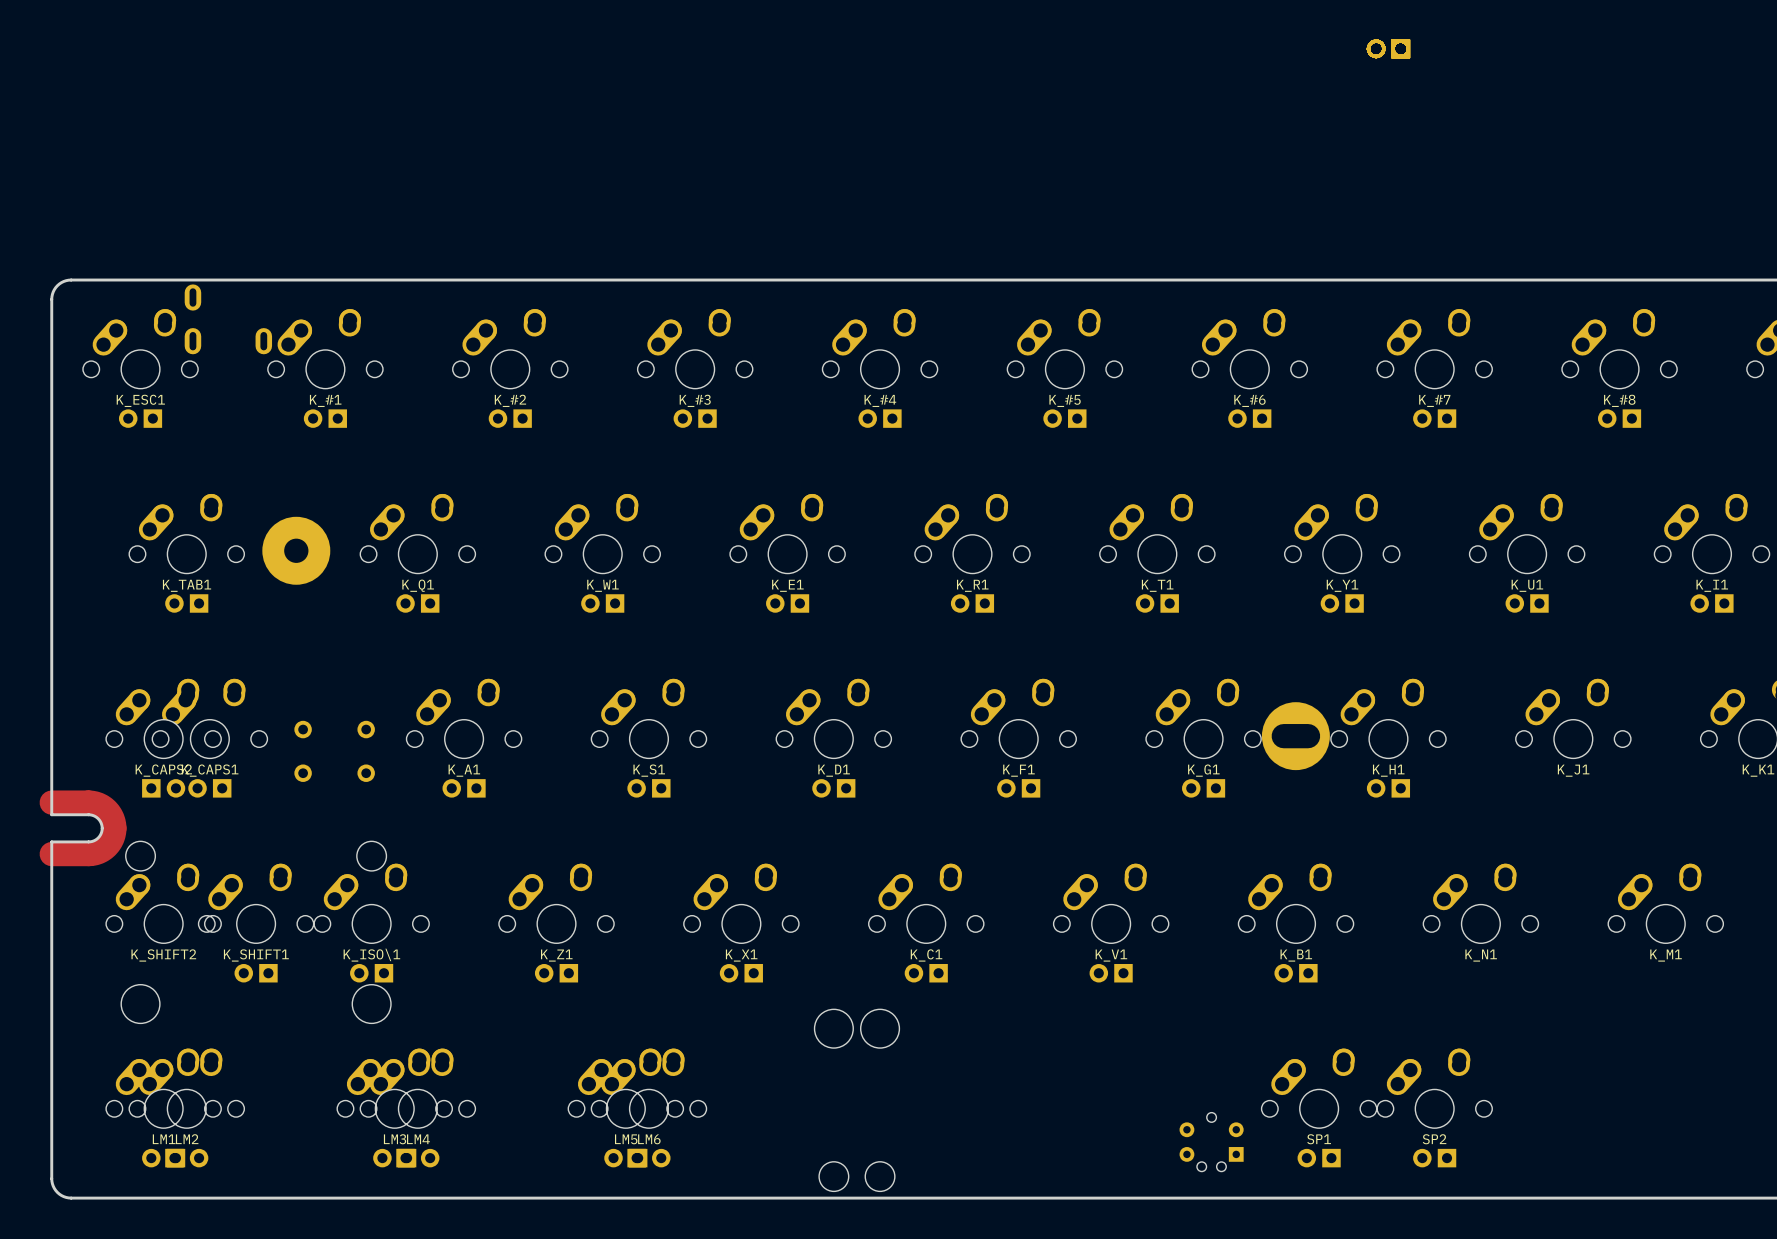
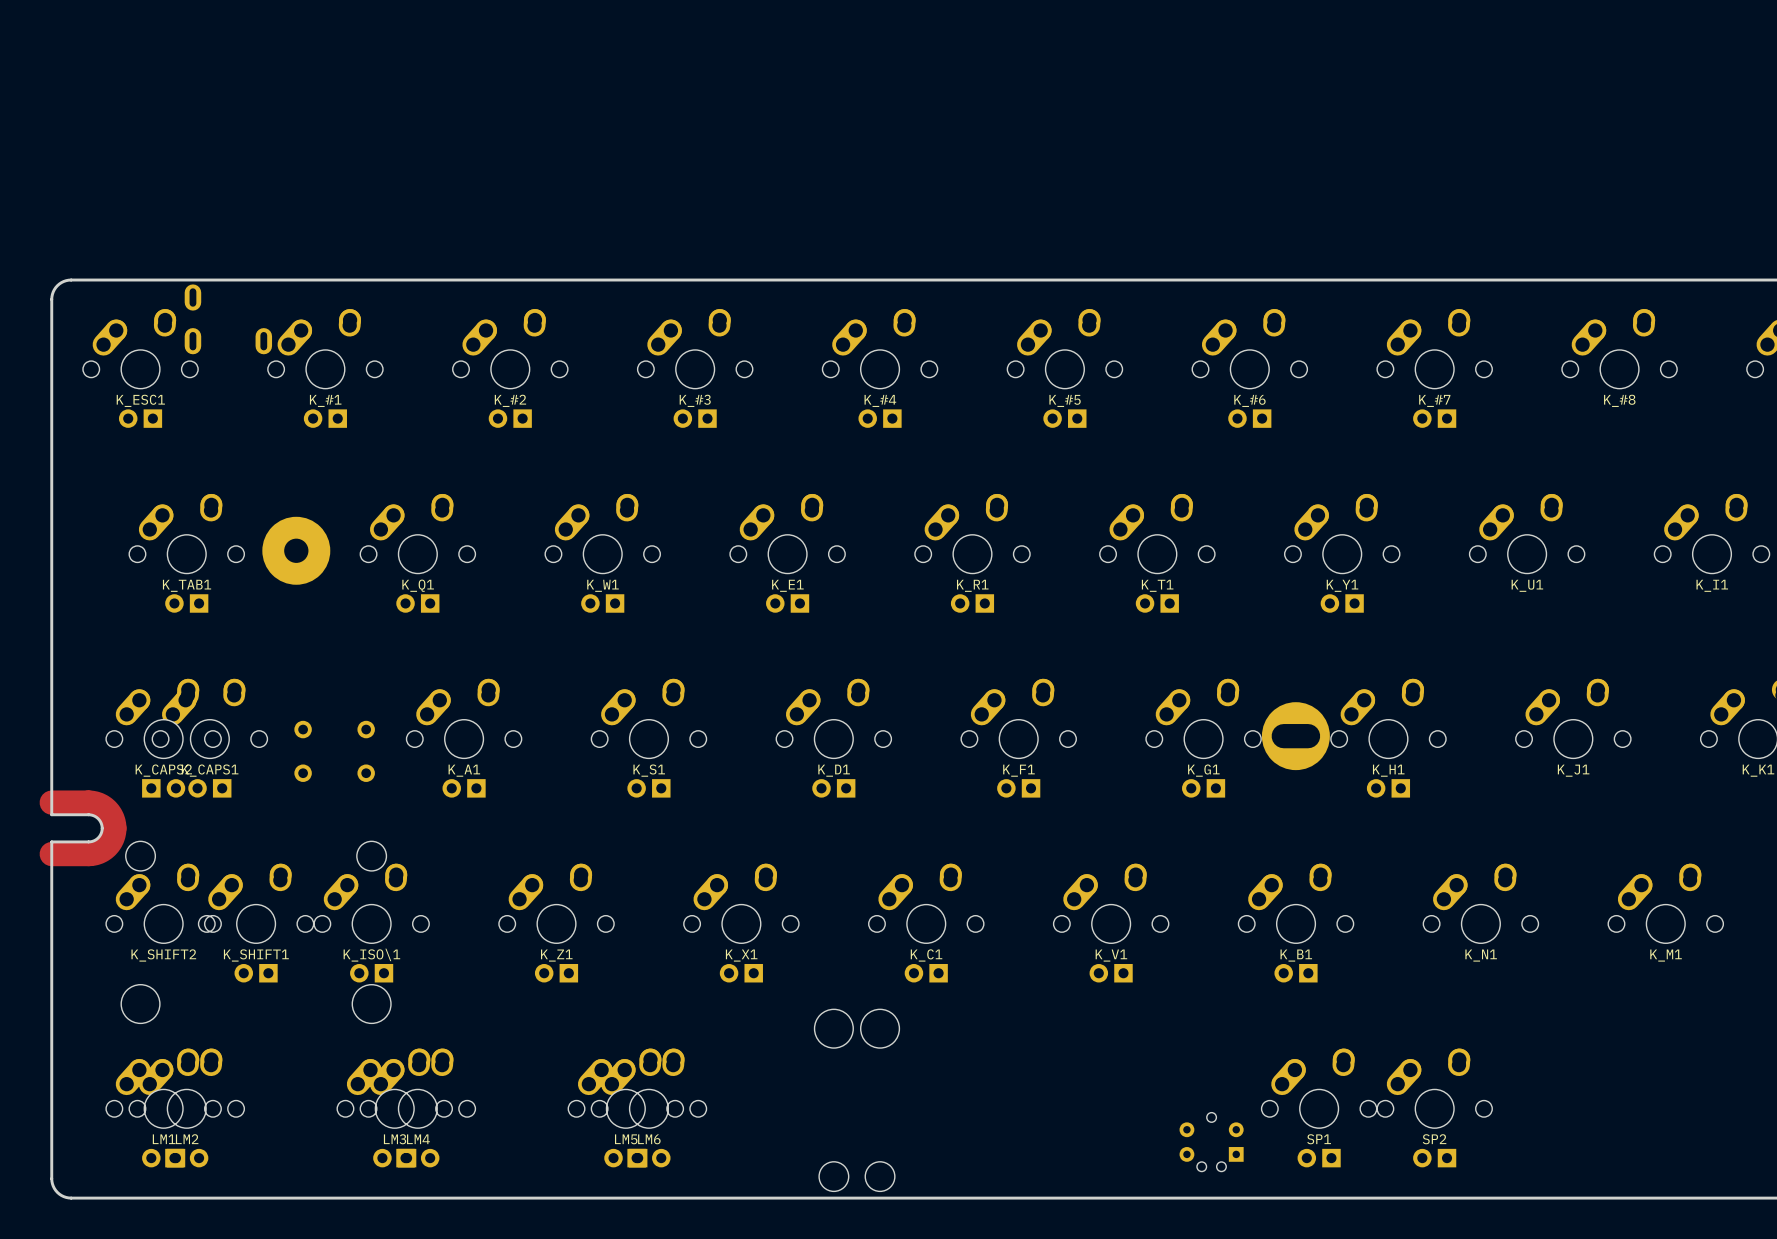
part: (1388, 48) -> none
part: (1619, 418) -> none
part: (1527, 603) -> none
part: (1712, 603) -> none

